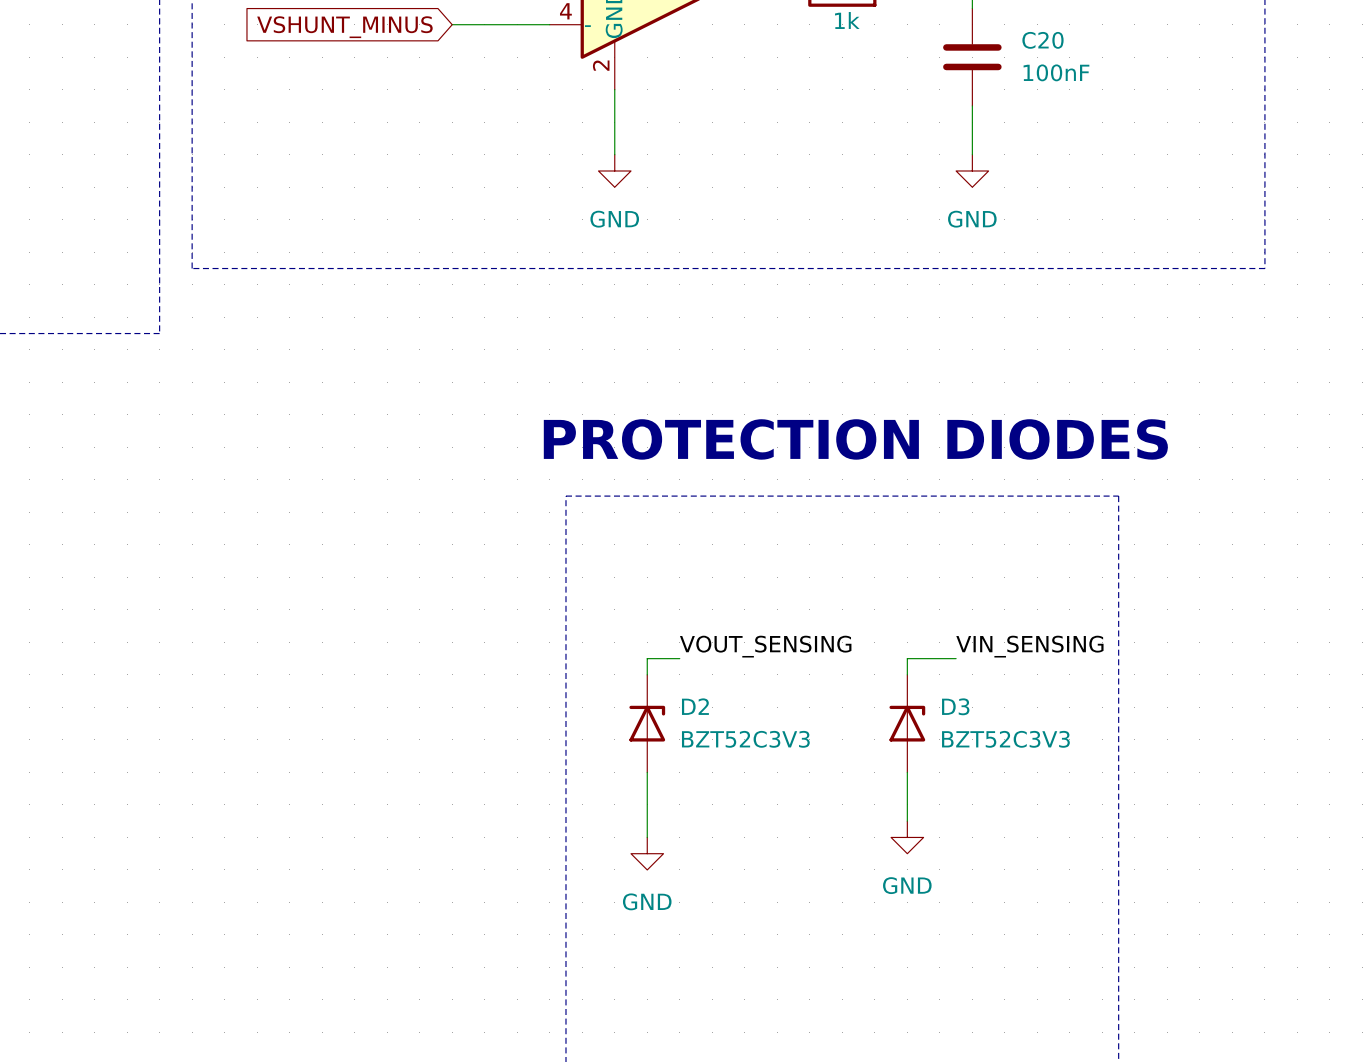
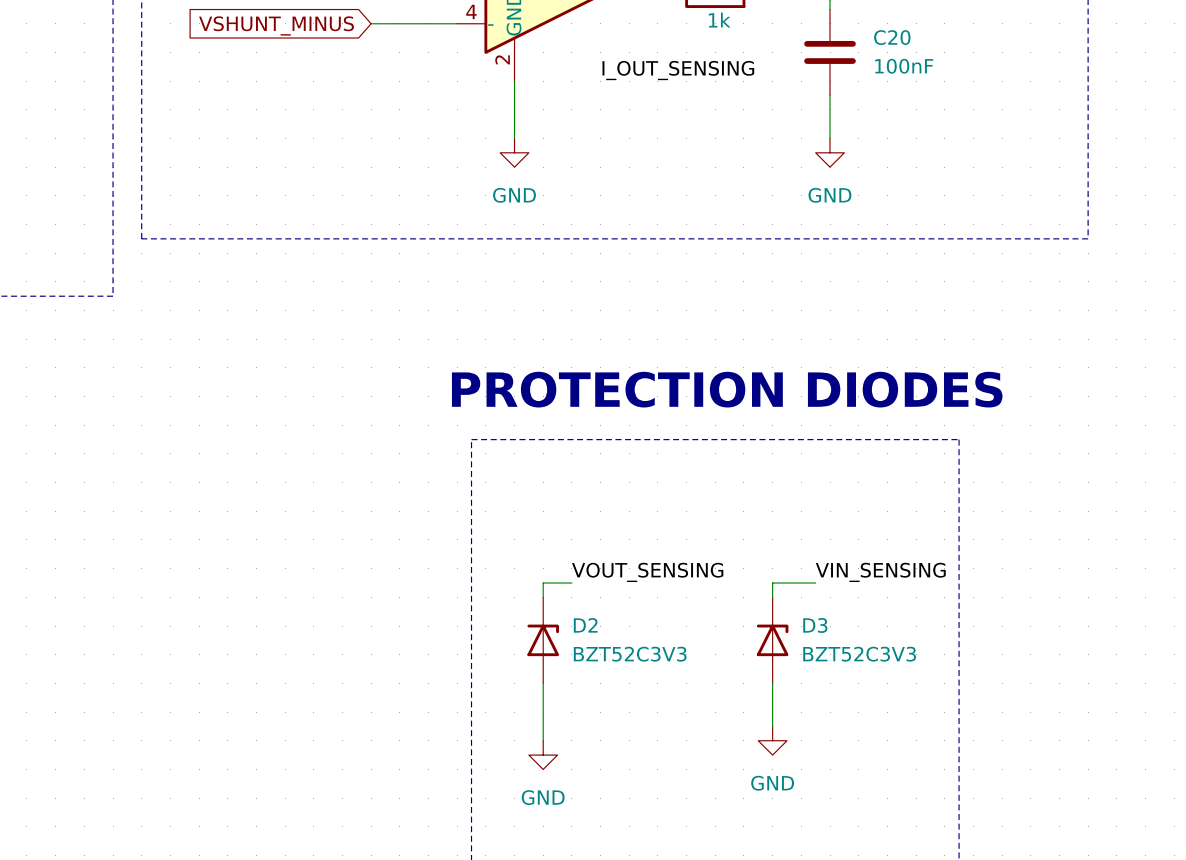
label: none -> I_OUT_SENSING (678, 70)

